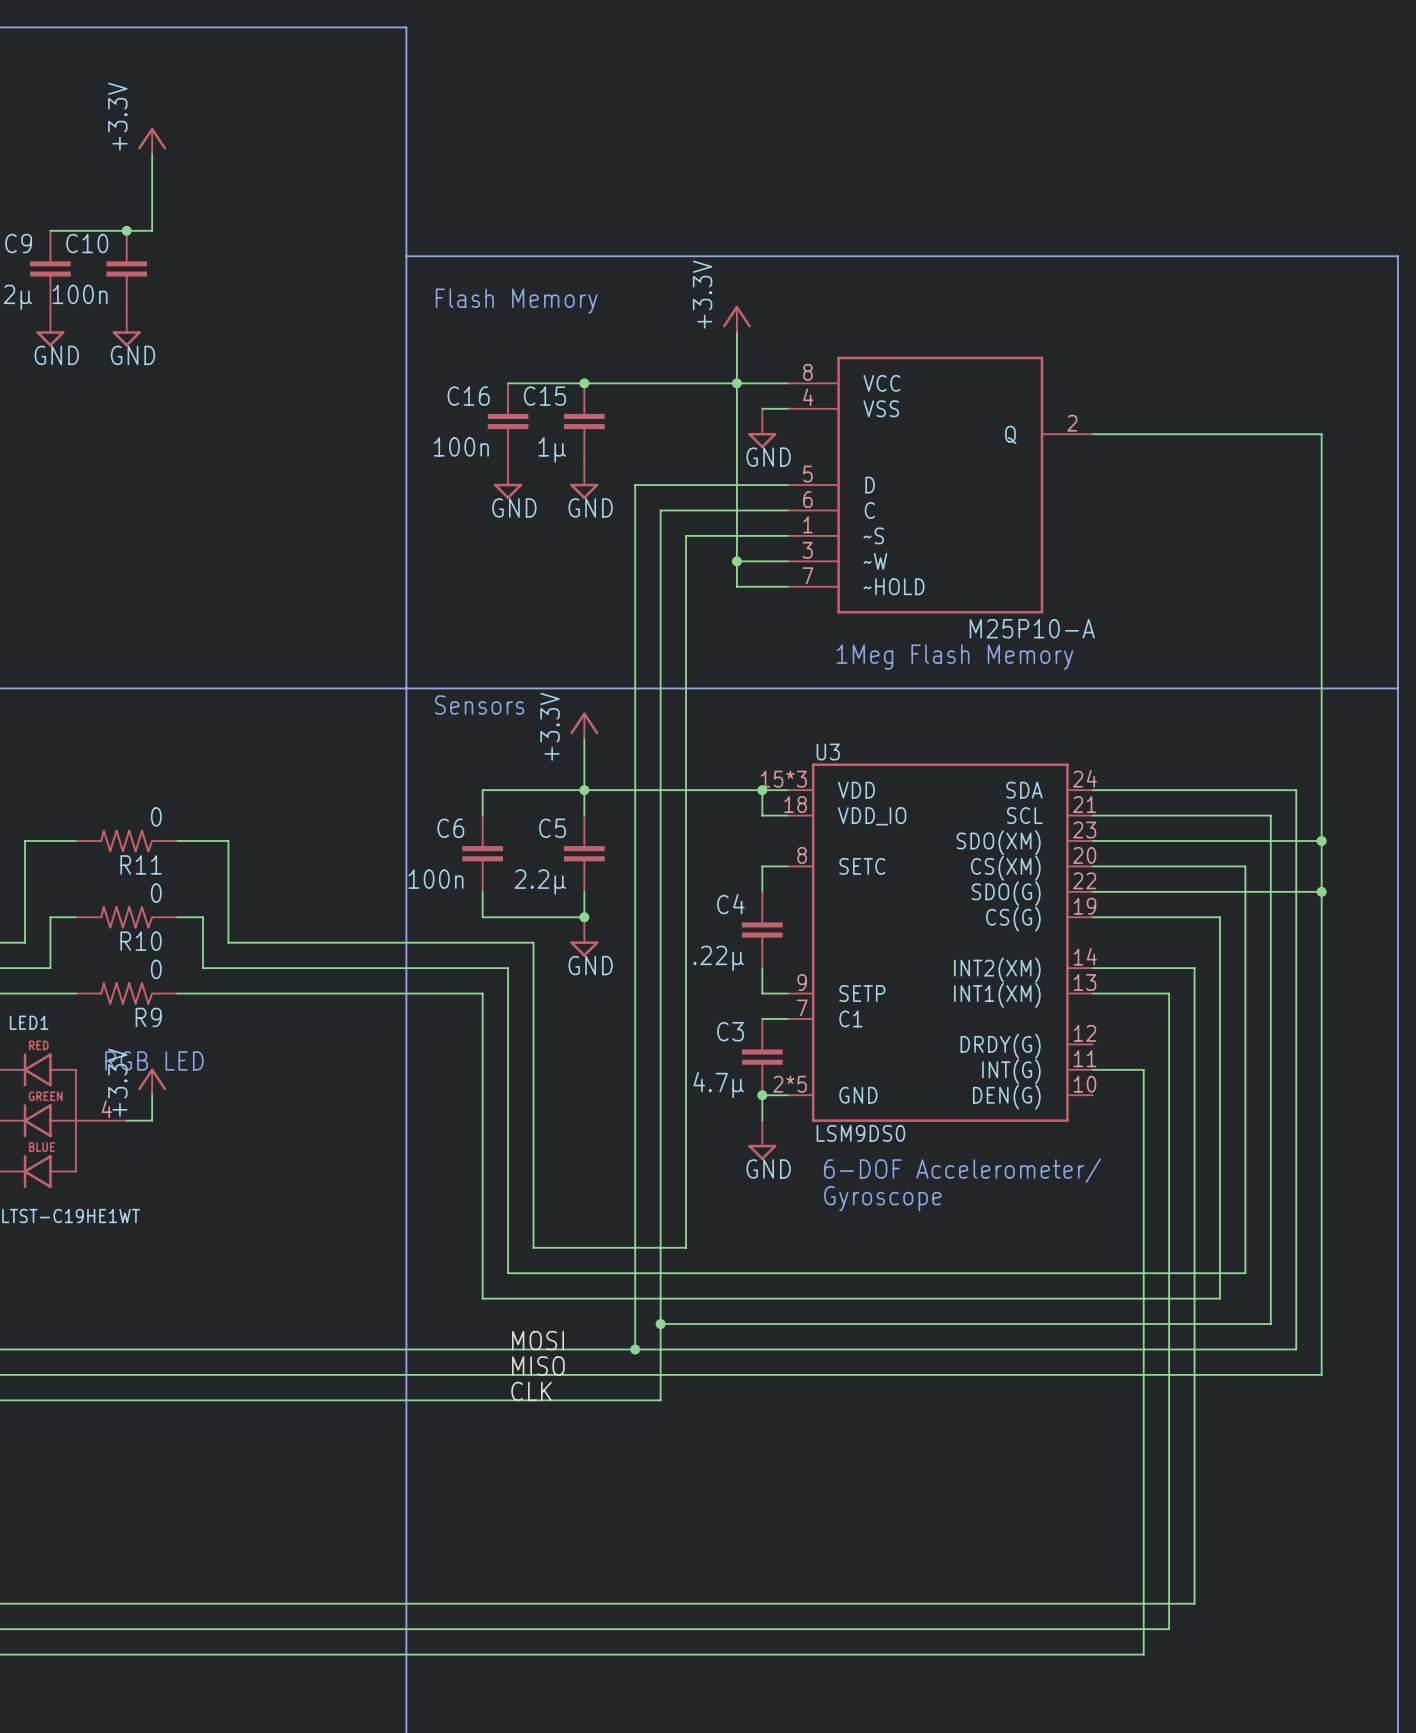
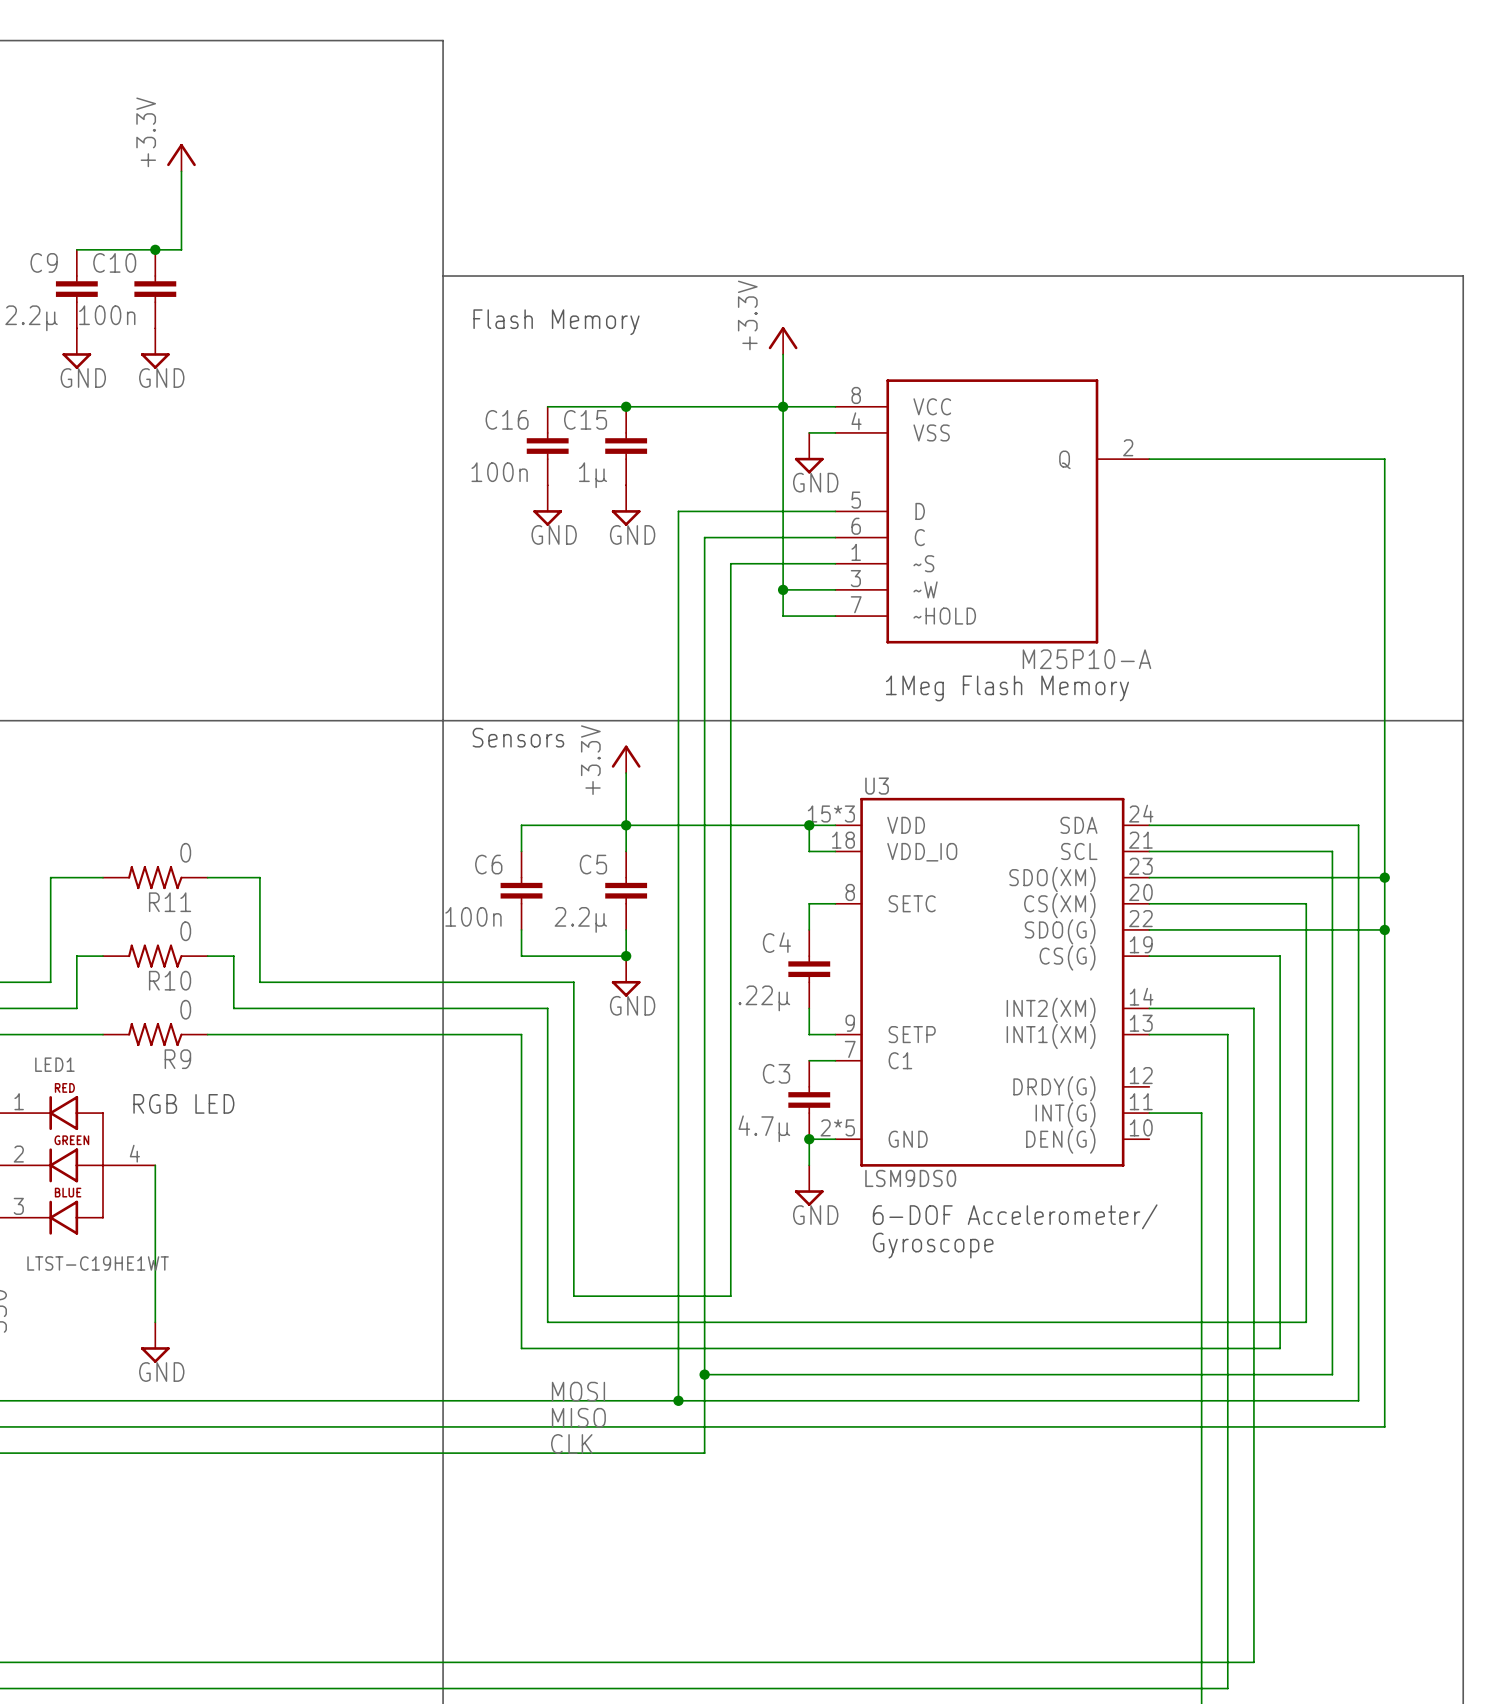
power symbol: +3.3V (152, 1081) -> none
wire: (152, 1095) (152, 1120) (126, 1120) -> (155, 1322) (155, 1165)
power symbol: none -> GND (155, 1342)

